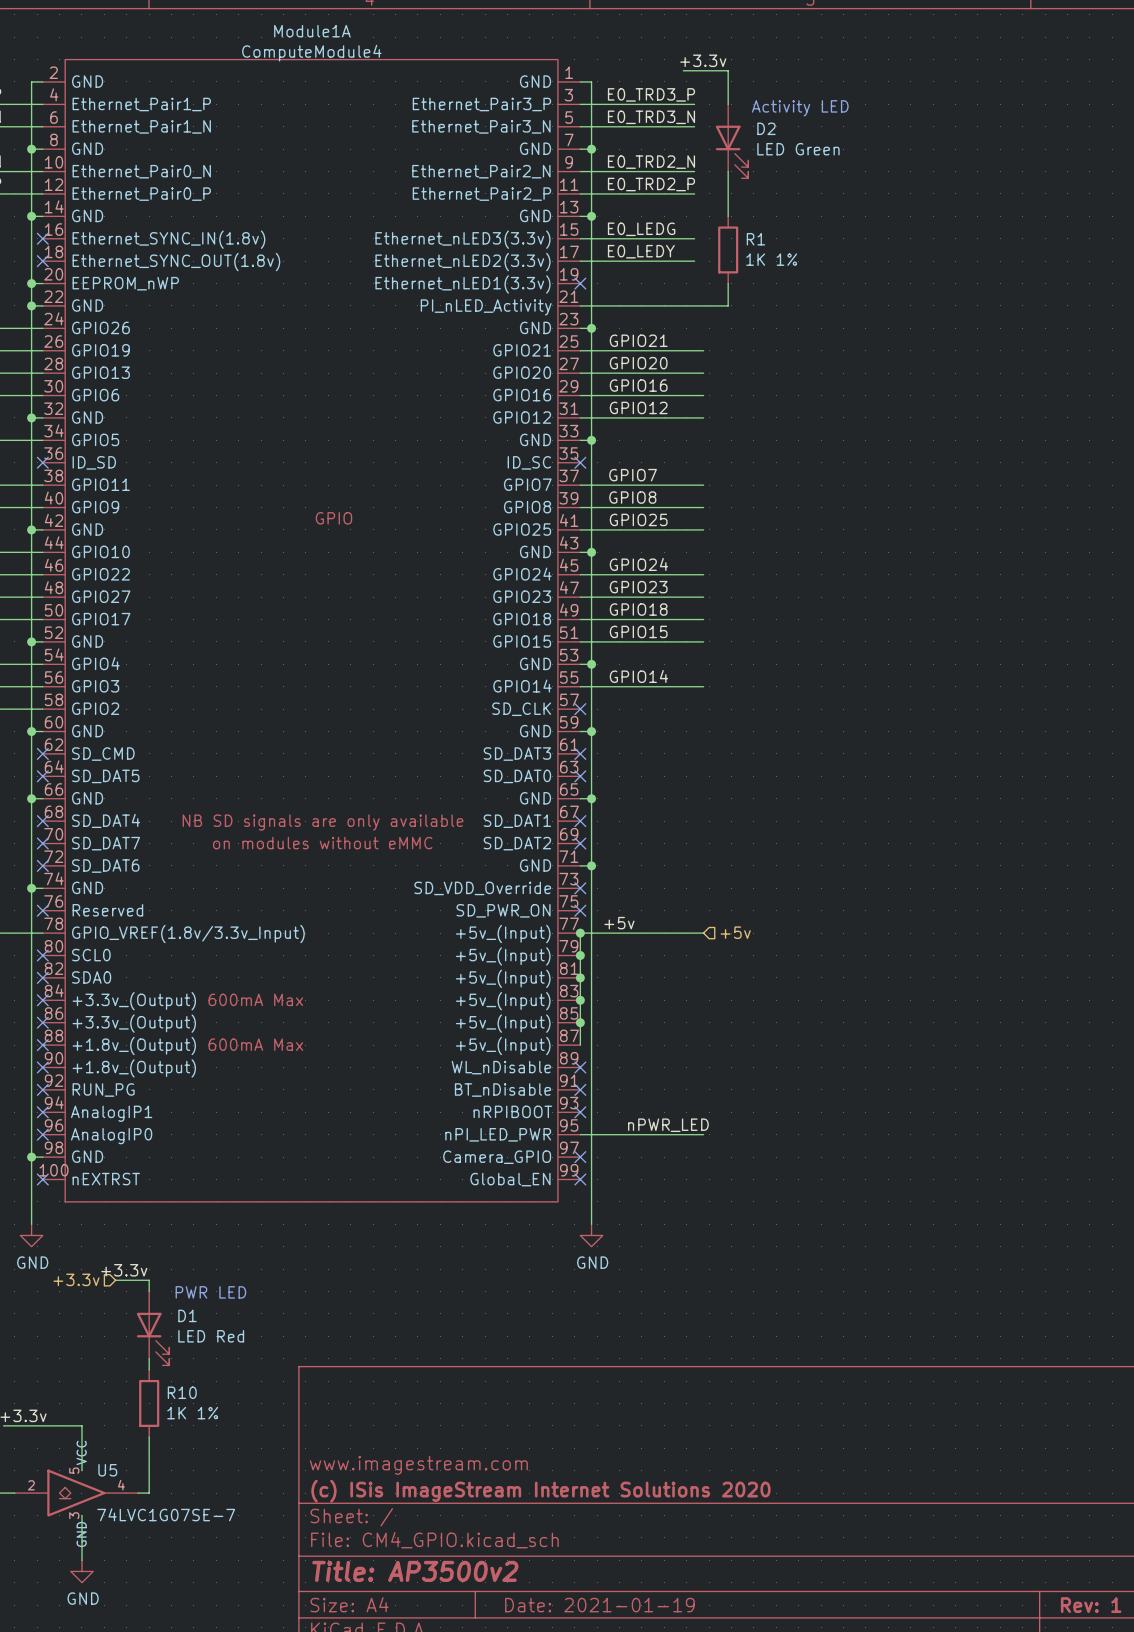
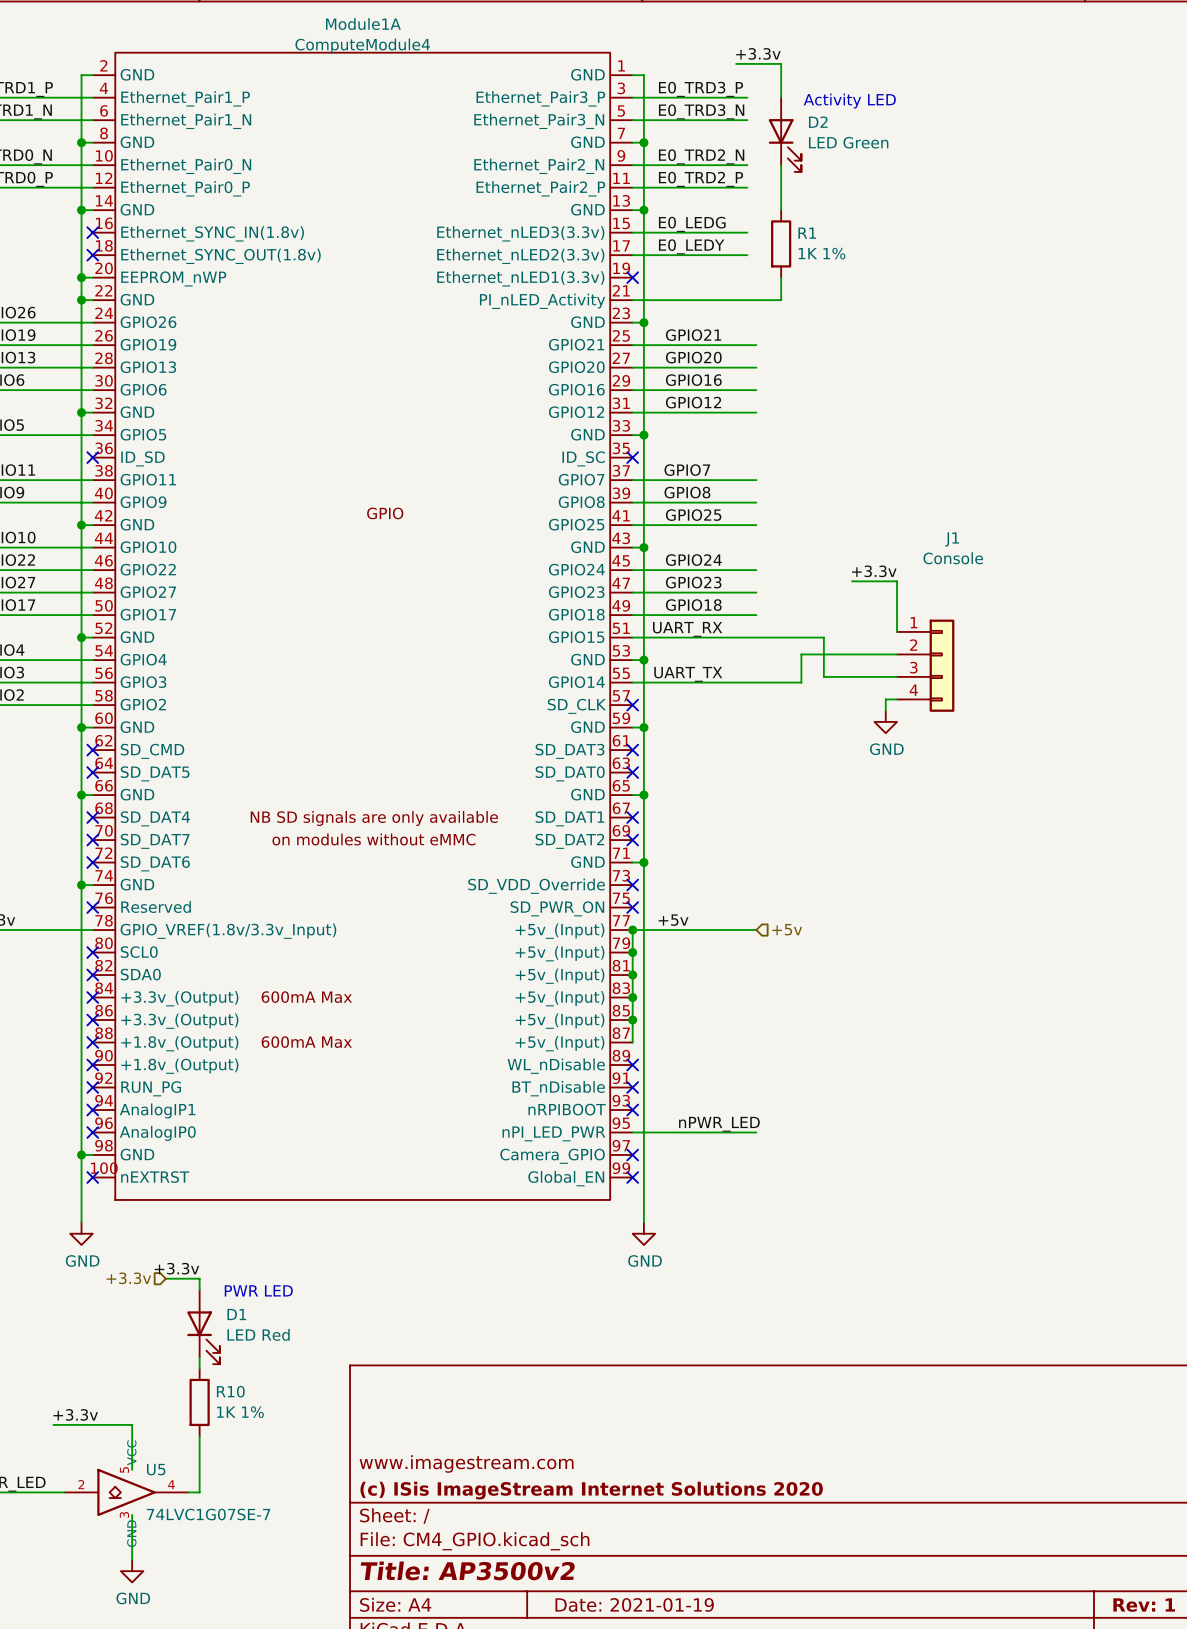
label: none -> +3.3v (874, 571)
wire: none -> (852, 581) (897, 581) (897, 631)
label: GPIO15 (638, 631) -> UART_RX (687, 629)
wire: none -> (756, 637) (823, 637) (823, 676) (897, 676)
wire: none -> (897, 654) (801, 654) (801, 682) (756, 682)
J1: none -> Console (925, 665)
label: GPIO14 (638, 676) -> UART_TX (688, 674)
wire: none -> (897, 699) (885, 699) (885, 710)
power symbol: none -> GND (885, 721)

